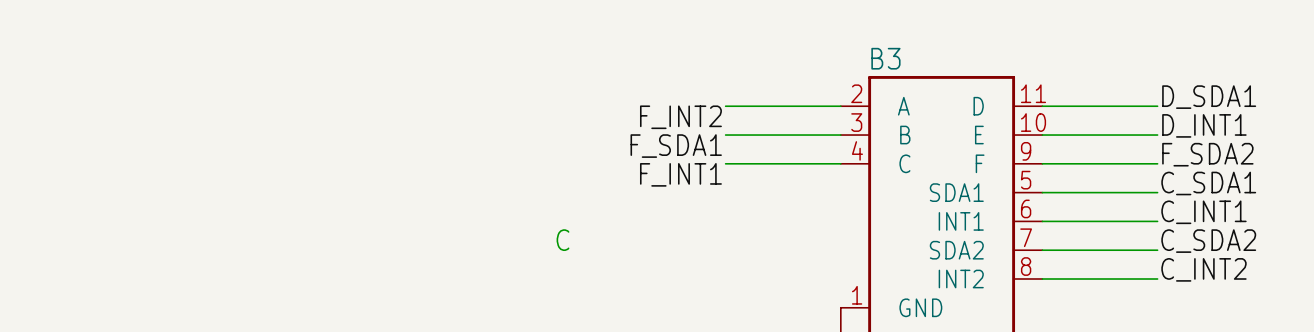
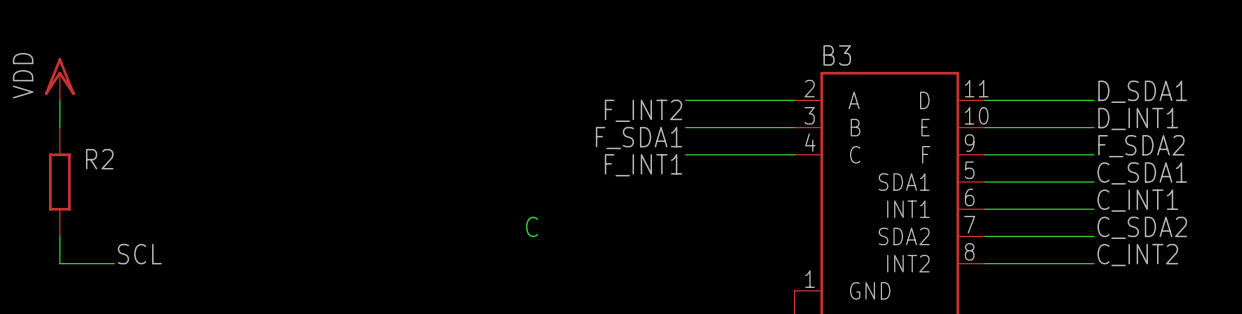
power symbol: none -> VDD (59, 79)
wire: none -> (59, 100) (59, 127)
R2: none -> (59, 182)
wire: none -> (59, 236) (59, 263) (114, 263)
label: none -> SCL (139, 254)

